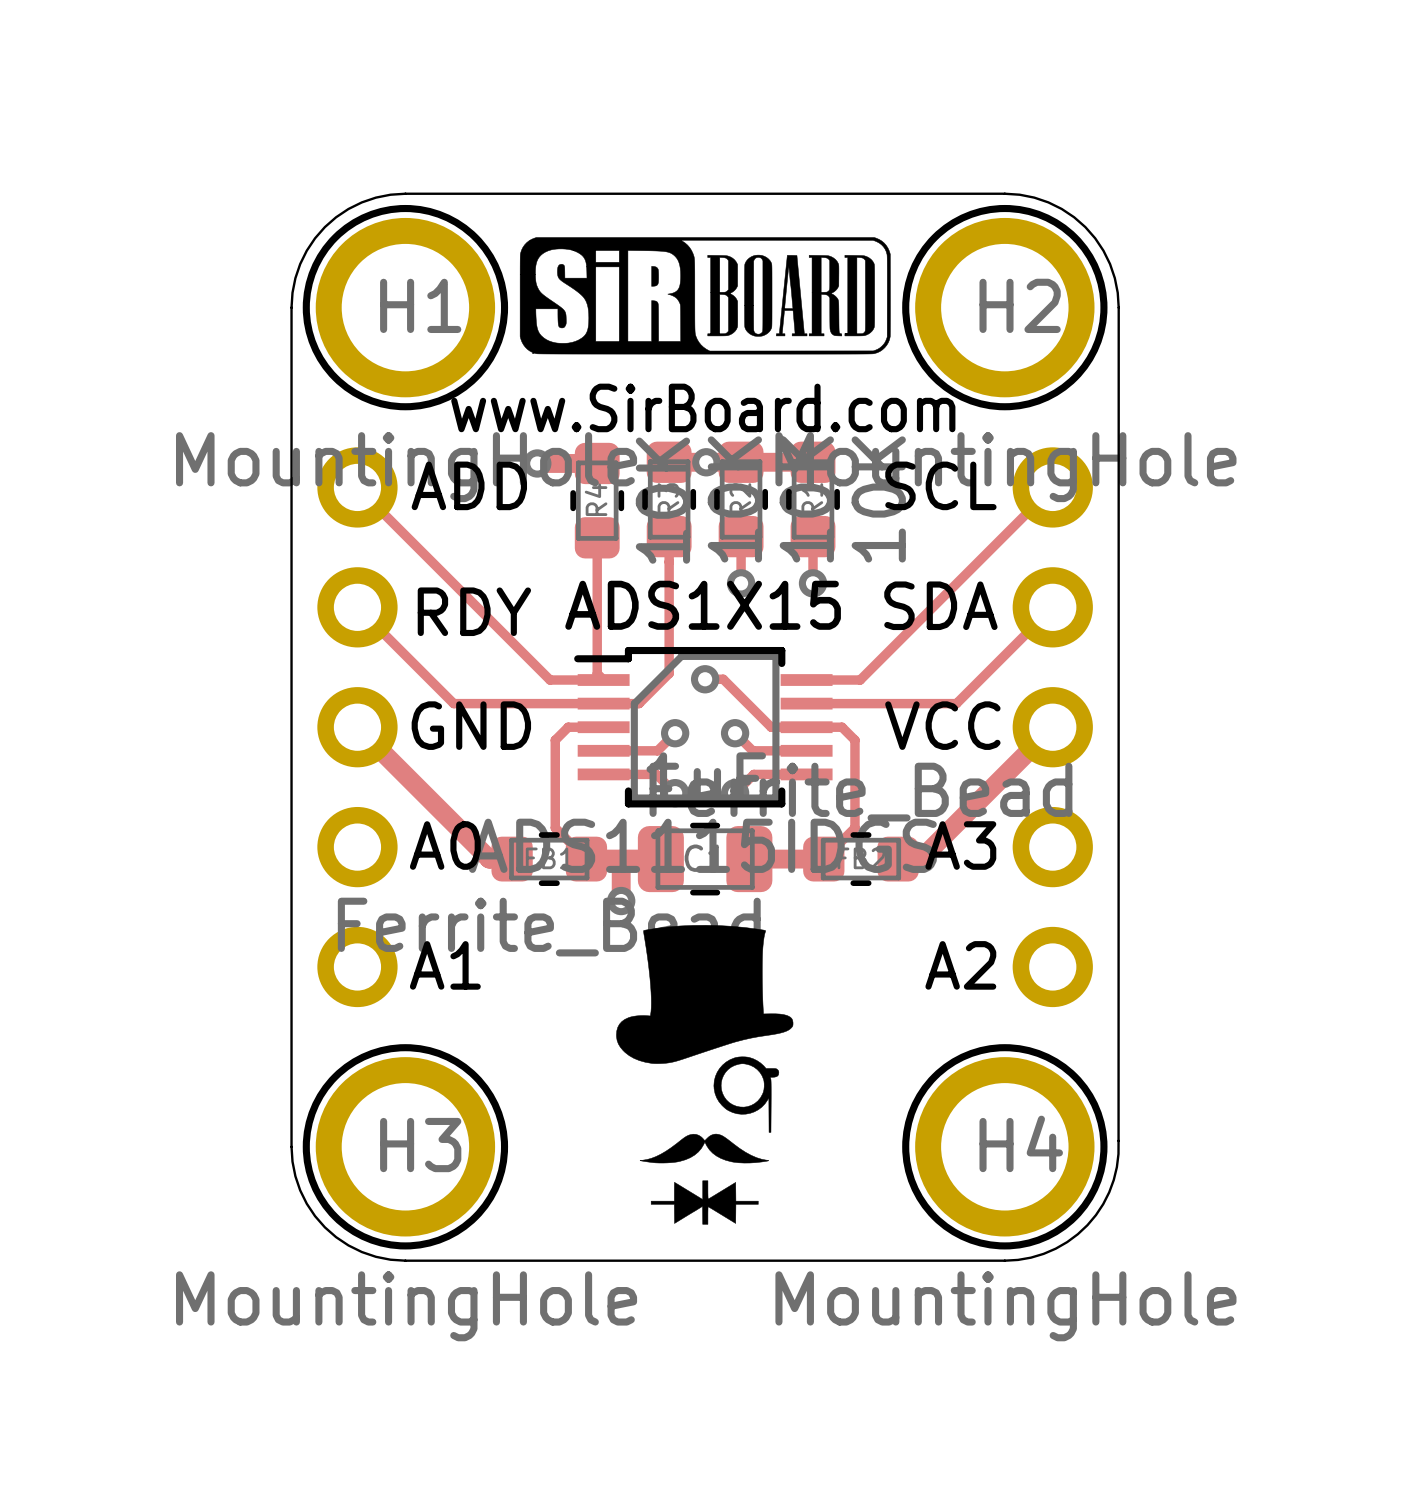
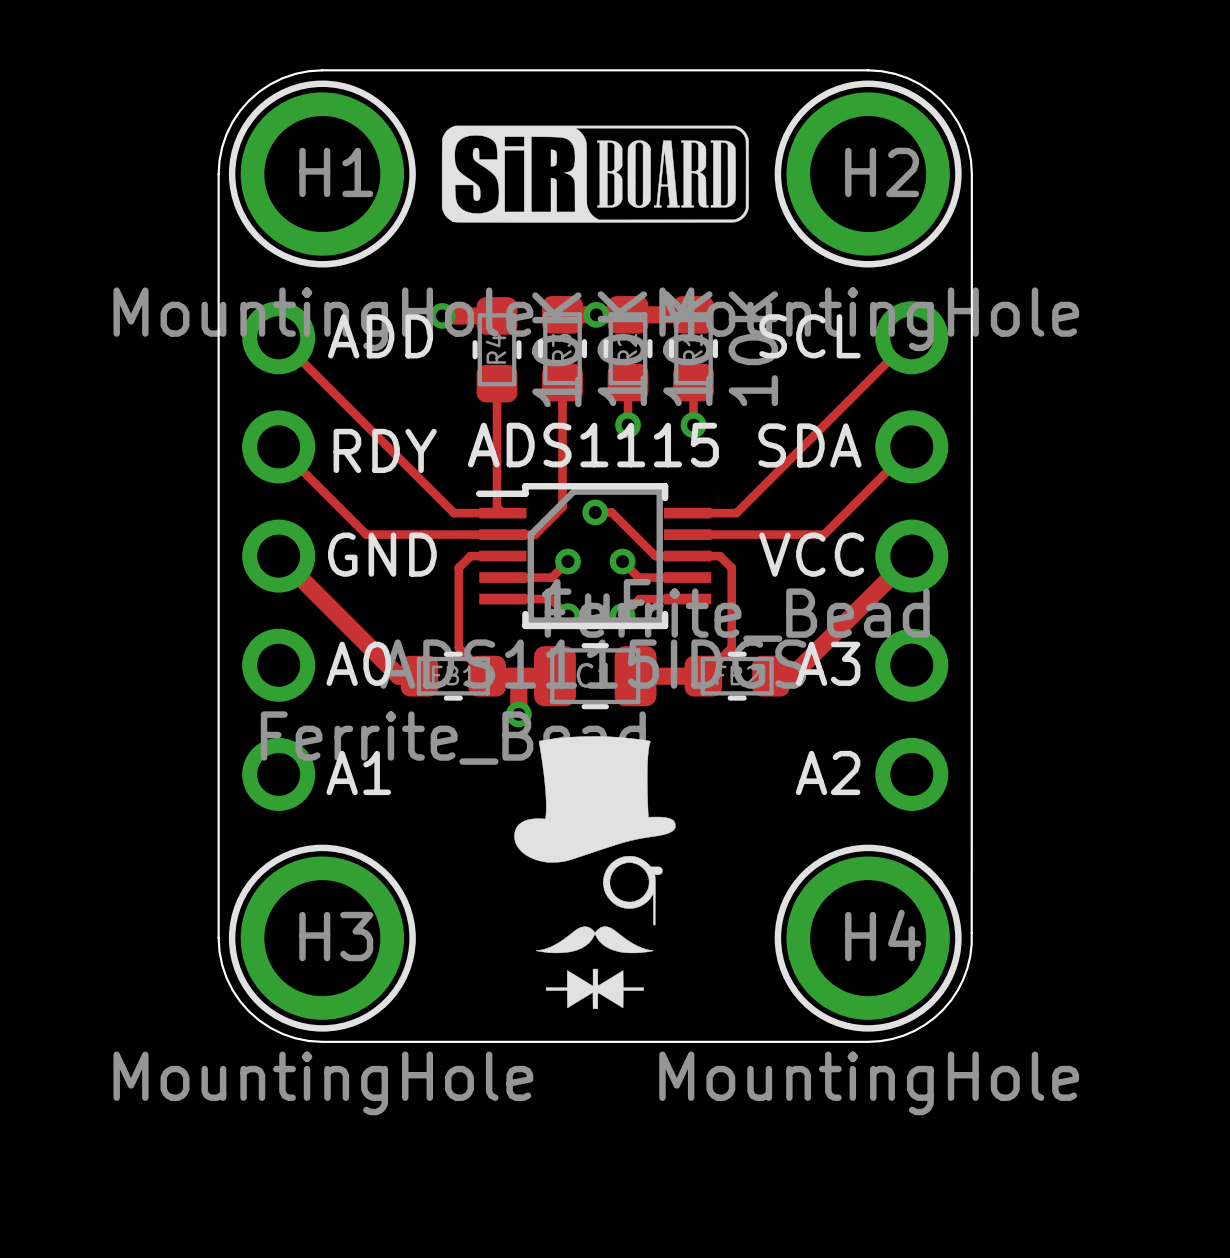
drawing shape: [519, 237, 891, 355] -> [441, 125, 749, 223]
text: www.SirBoard.com (703, 407) -> none
ADS1X15 name: ADS1X15 (703, 605) -> ADS1115 (593, 445)

